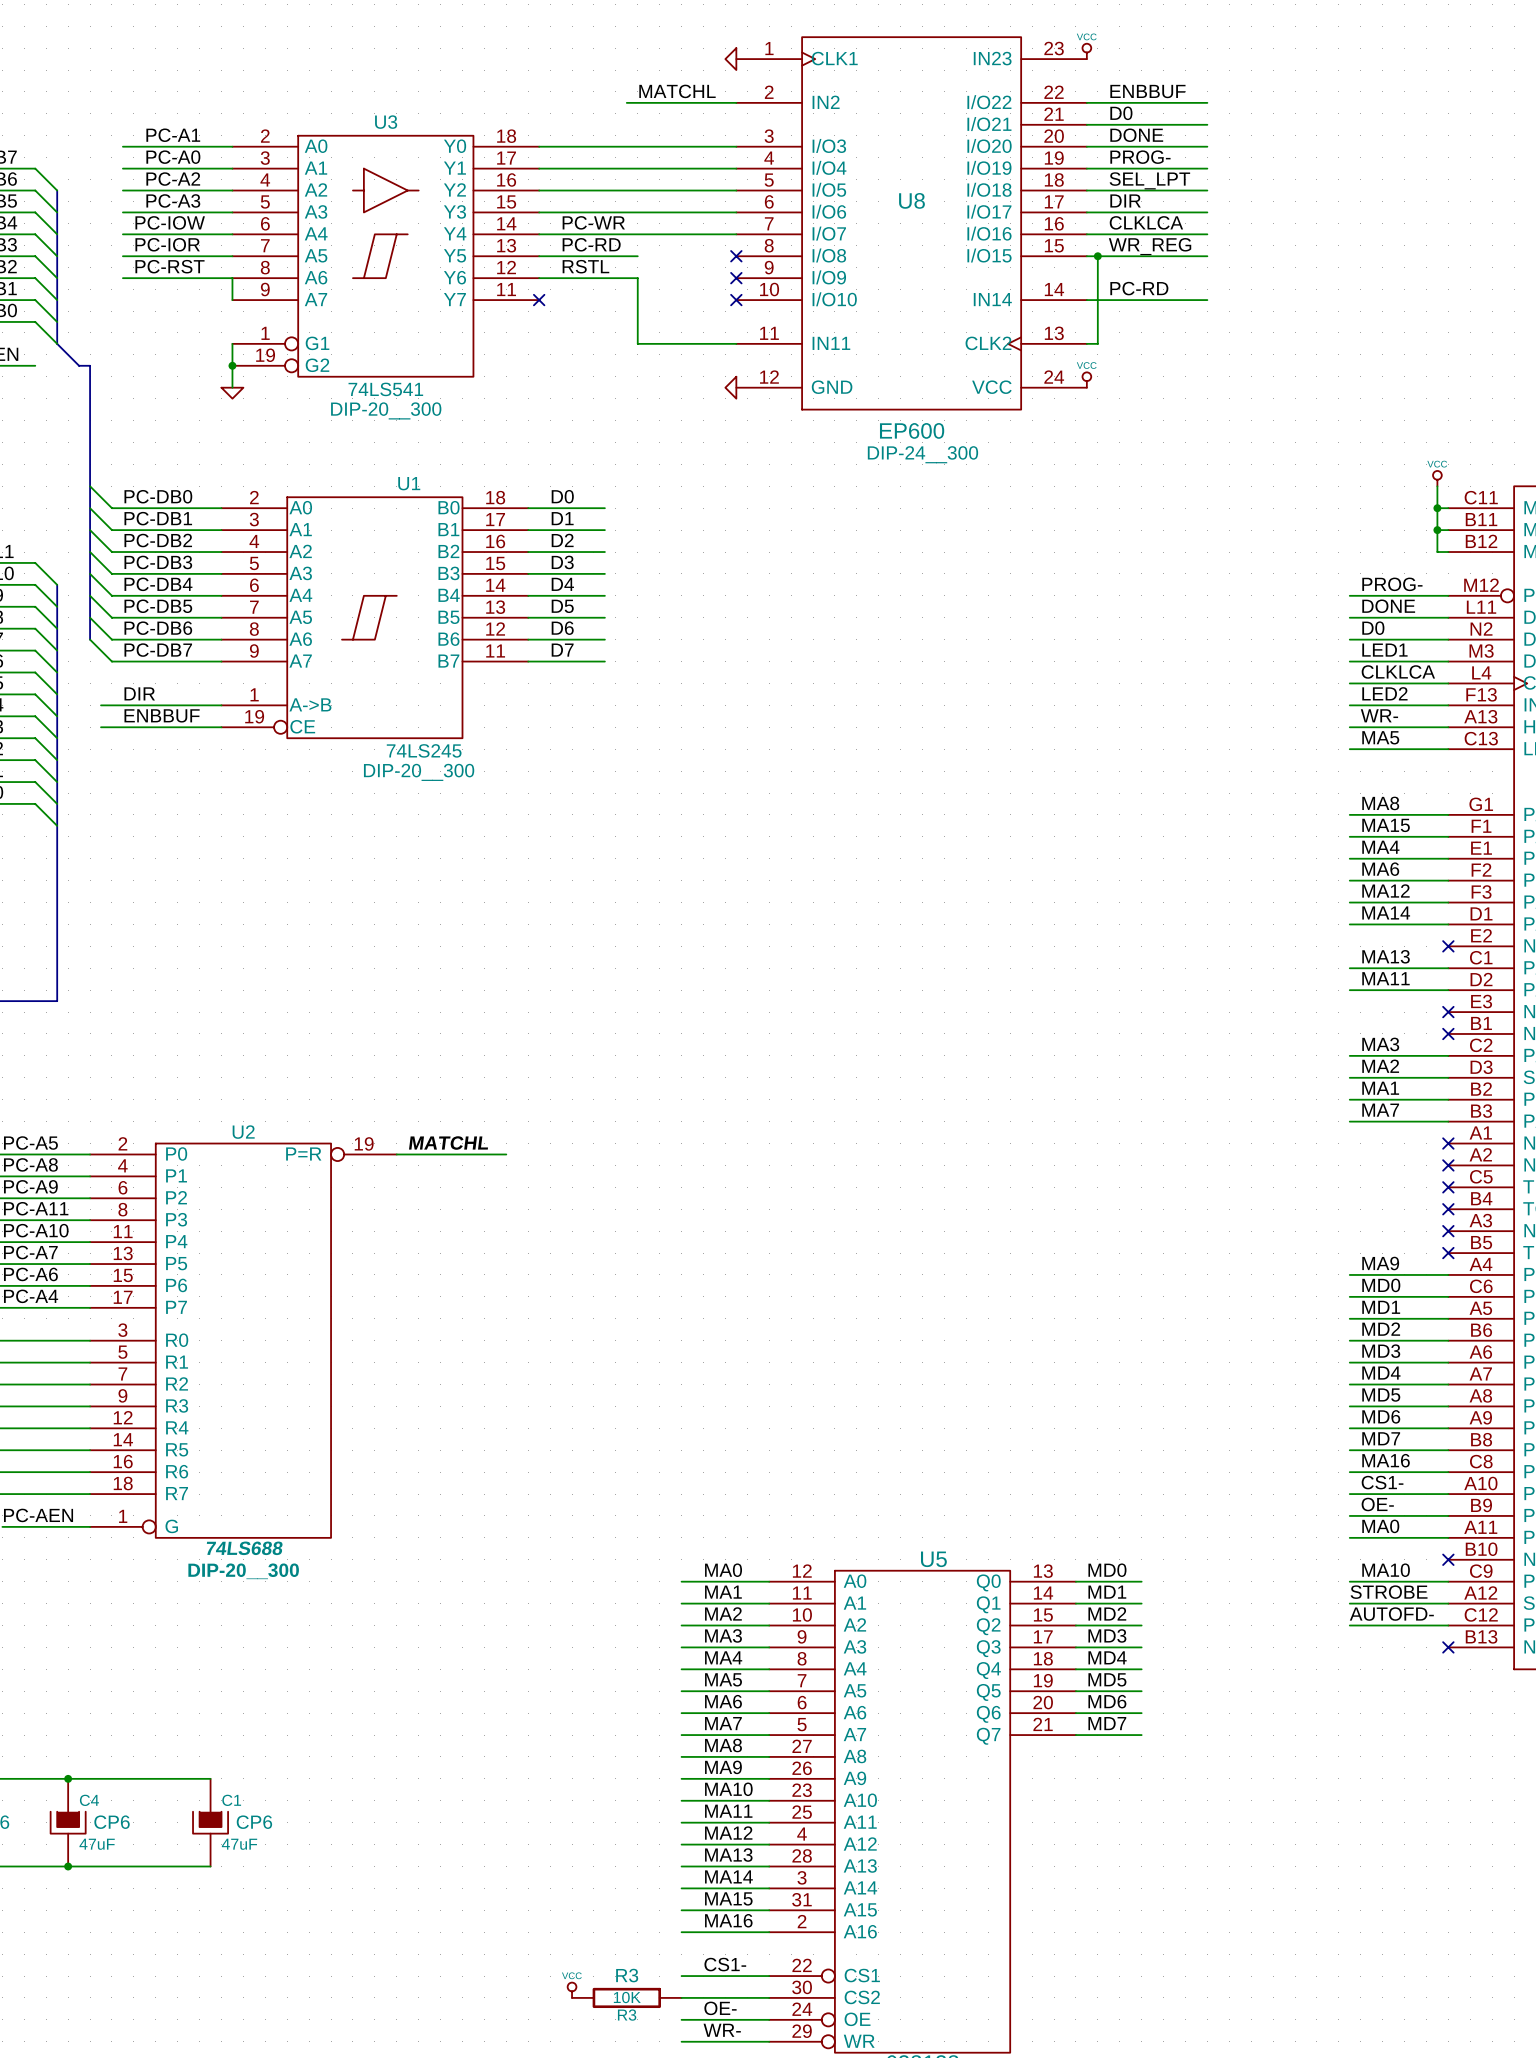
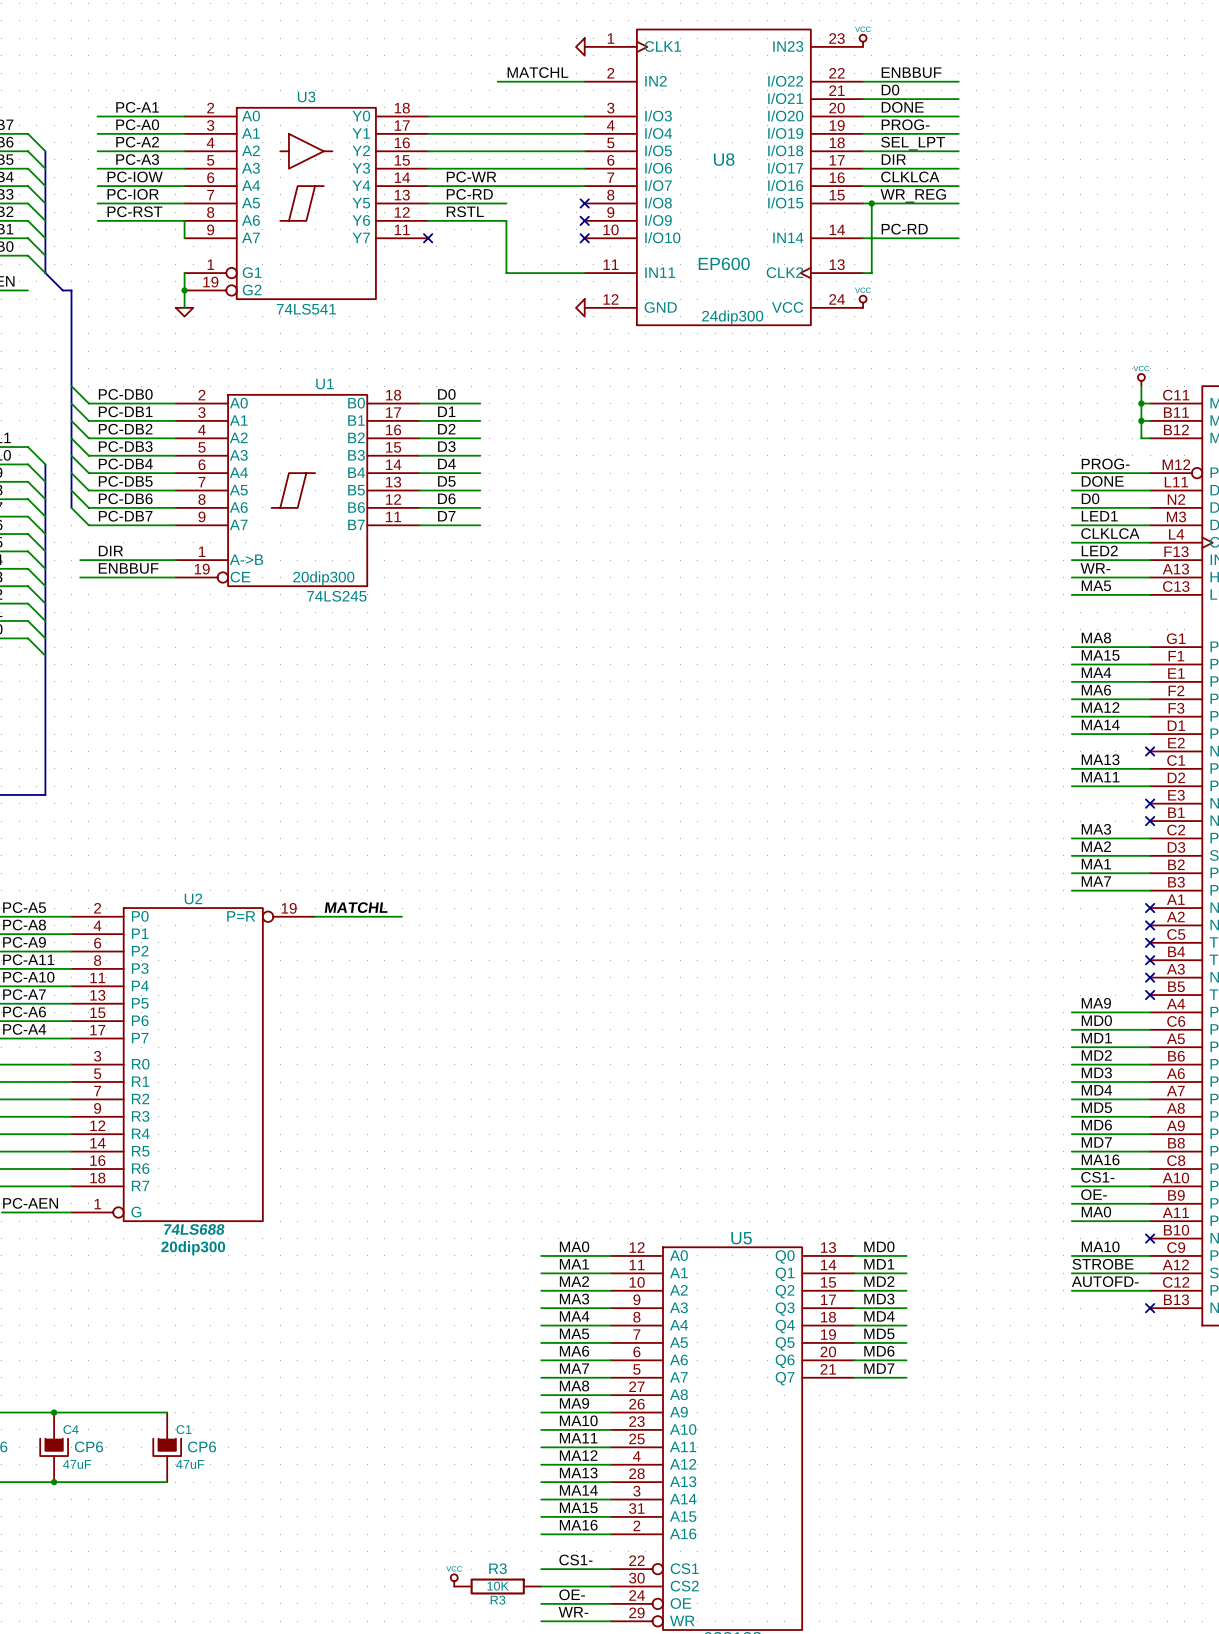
U3 text: DIP-20__300 (386, 410) -> none
U8 value position: EP600 (912, 430) -> EP600 (724, 263)
U8 text: DIP-24__300 (922, 454) -> 24dip300 (732, 317)
U1 text: DIP-20__300 (419, 772) -> 20dip300 (323, 578)
U2 text: DIP-20__300 (243, 1571) -> 20dip300 (193, 1248)

